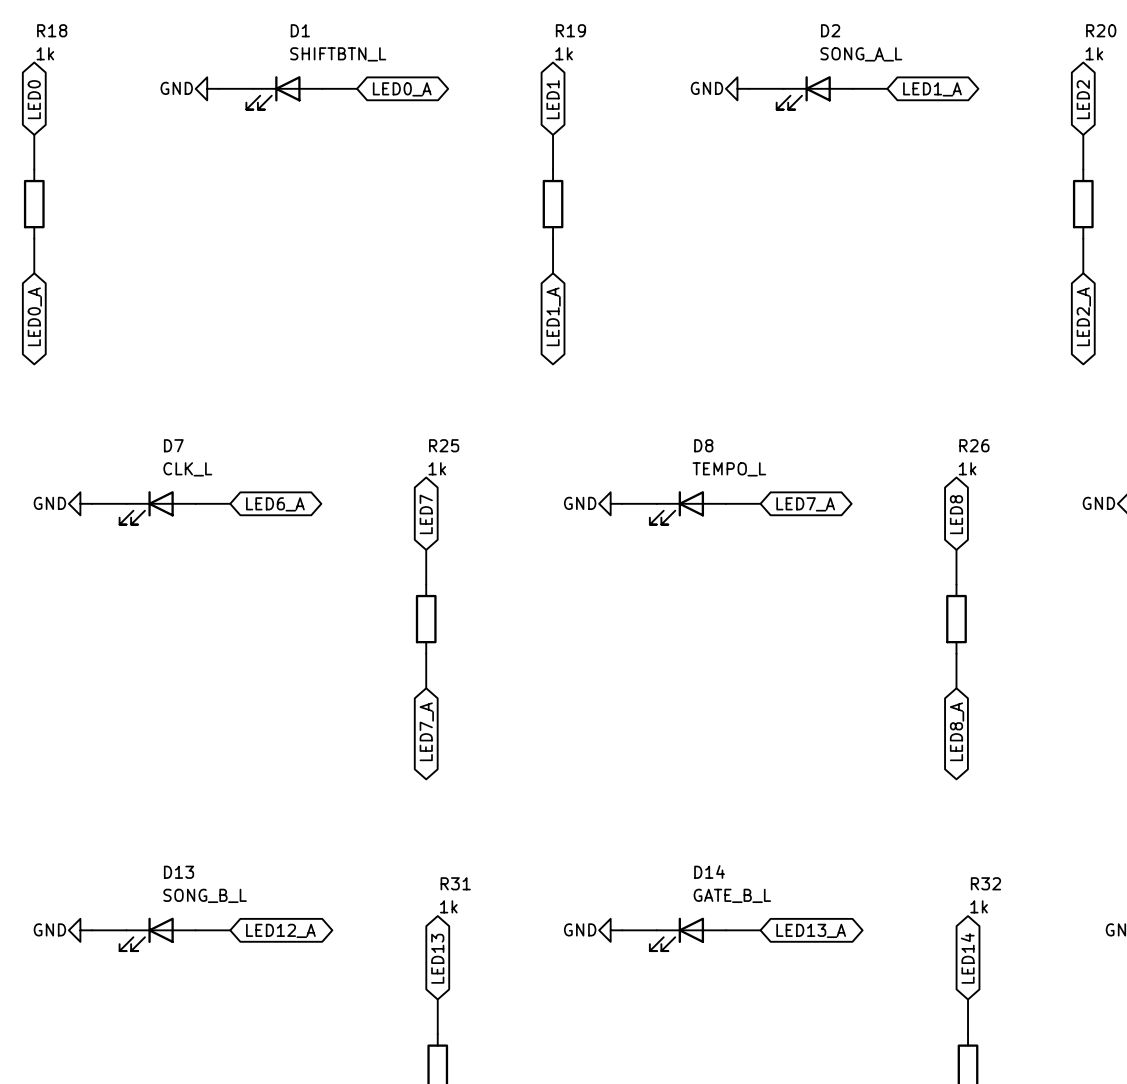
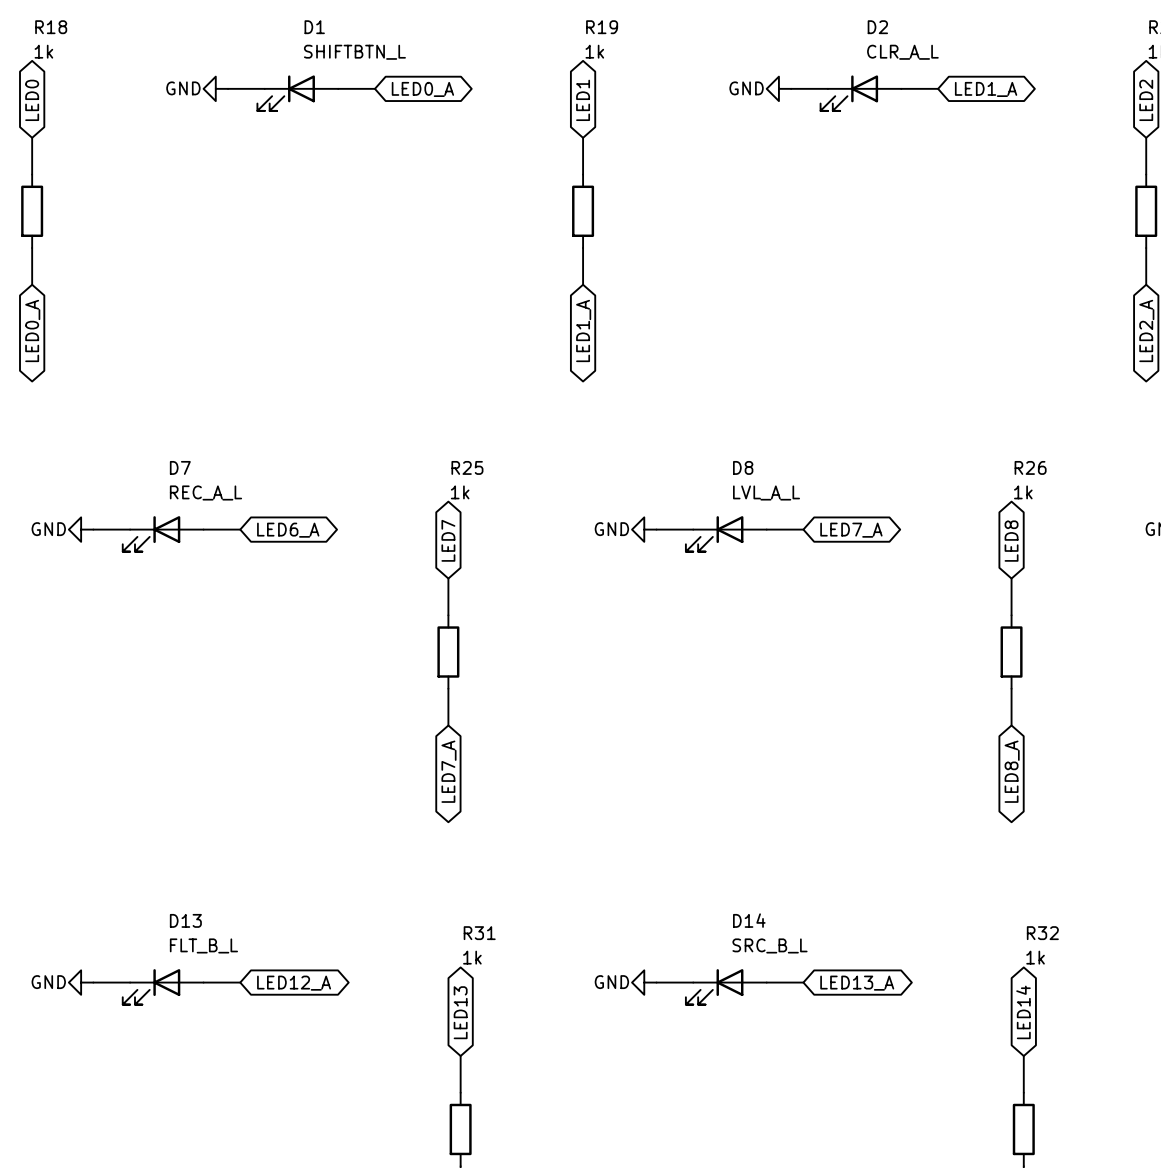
D2 value: SONG_A_L (861, 54) -> CLR_A_L (902, 52)
D7 value: CLK_L (187, 469) -> REC_A_L (205, 492)
D8 value: TEMPO_L (729, 469) -> LVL_A_L (766, 492)
D13 value: SONG_B_L (205, 895) -> FLT_B_L (203, 945)
D14 value: GATE_B_L (732, 895) -> SRC_B_L (770, 945)

